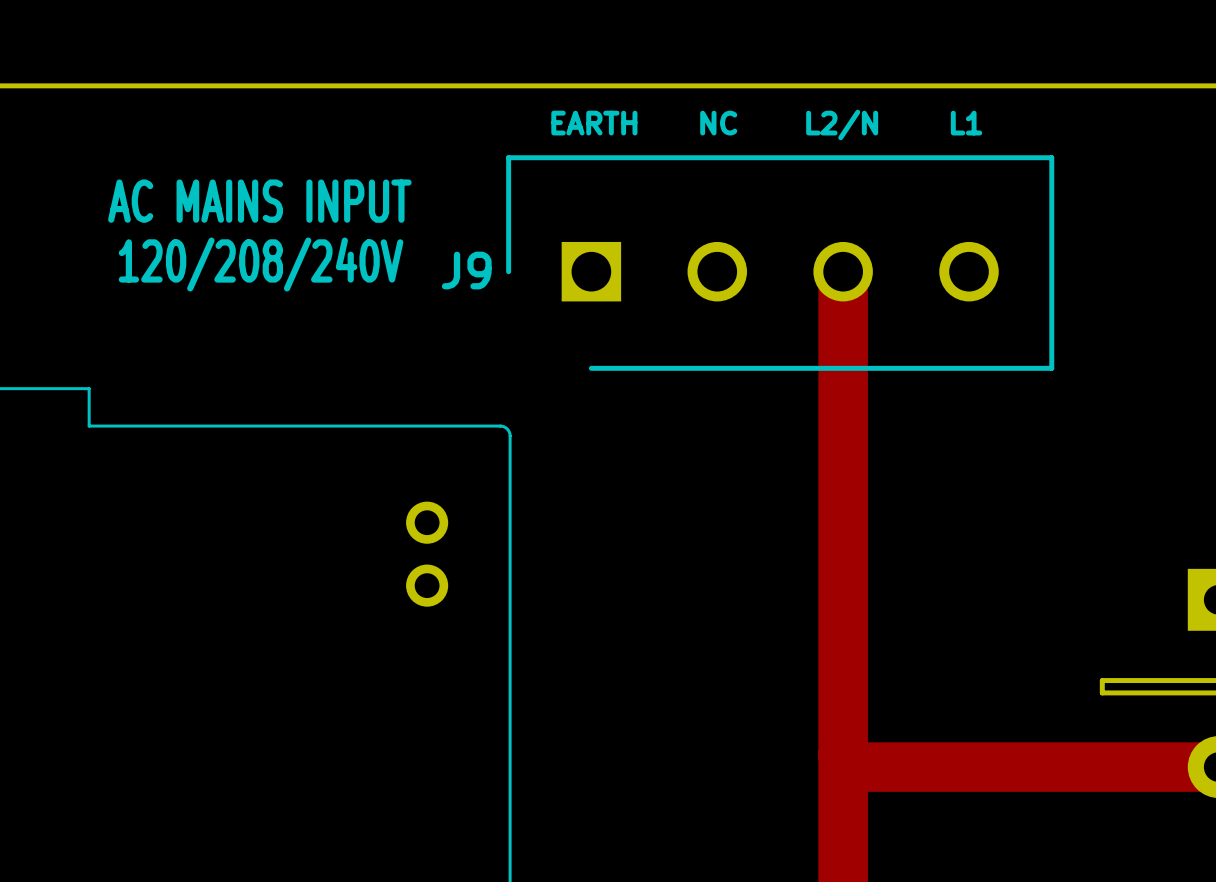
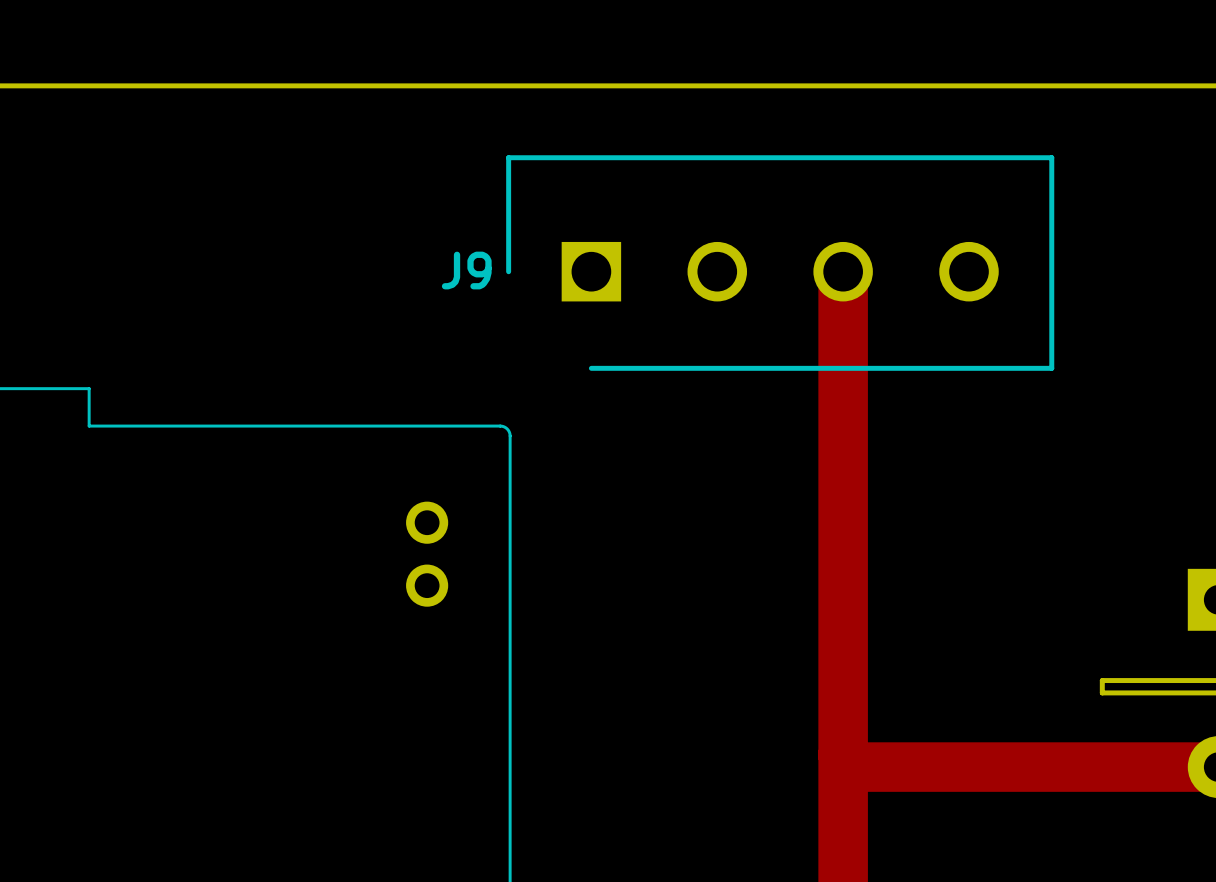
text: EARTH (594, 123) -> none
text: NC (718, 123) -> none
text: L1 (966, 123) -> none
text: L2/N (842, 124) -> none
text: AC MAINS INPUT (259, 201) -> none
text: 120/208/240V (261, 264) -> none

